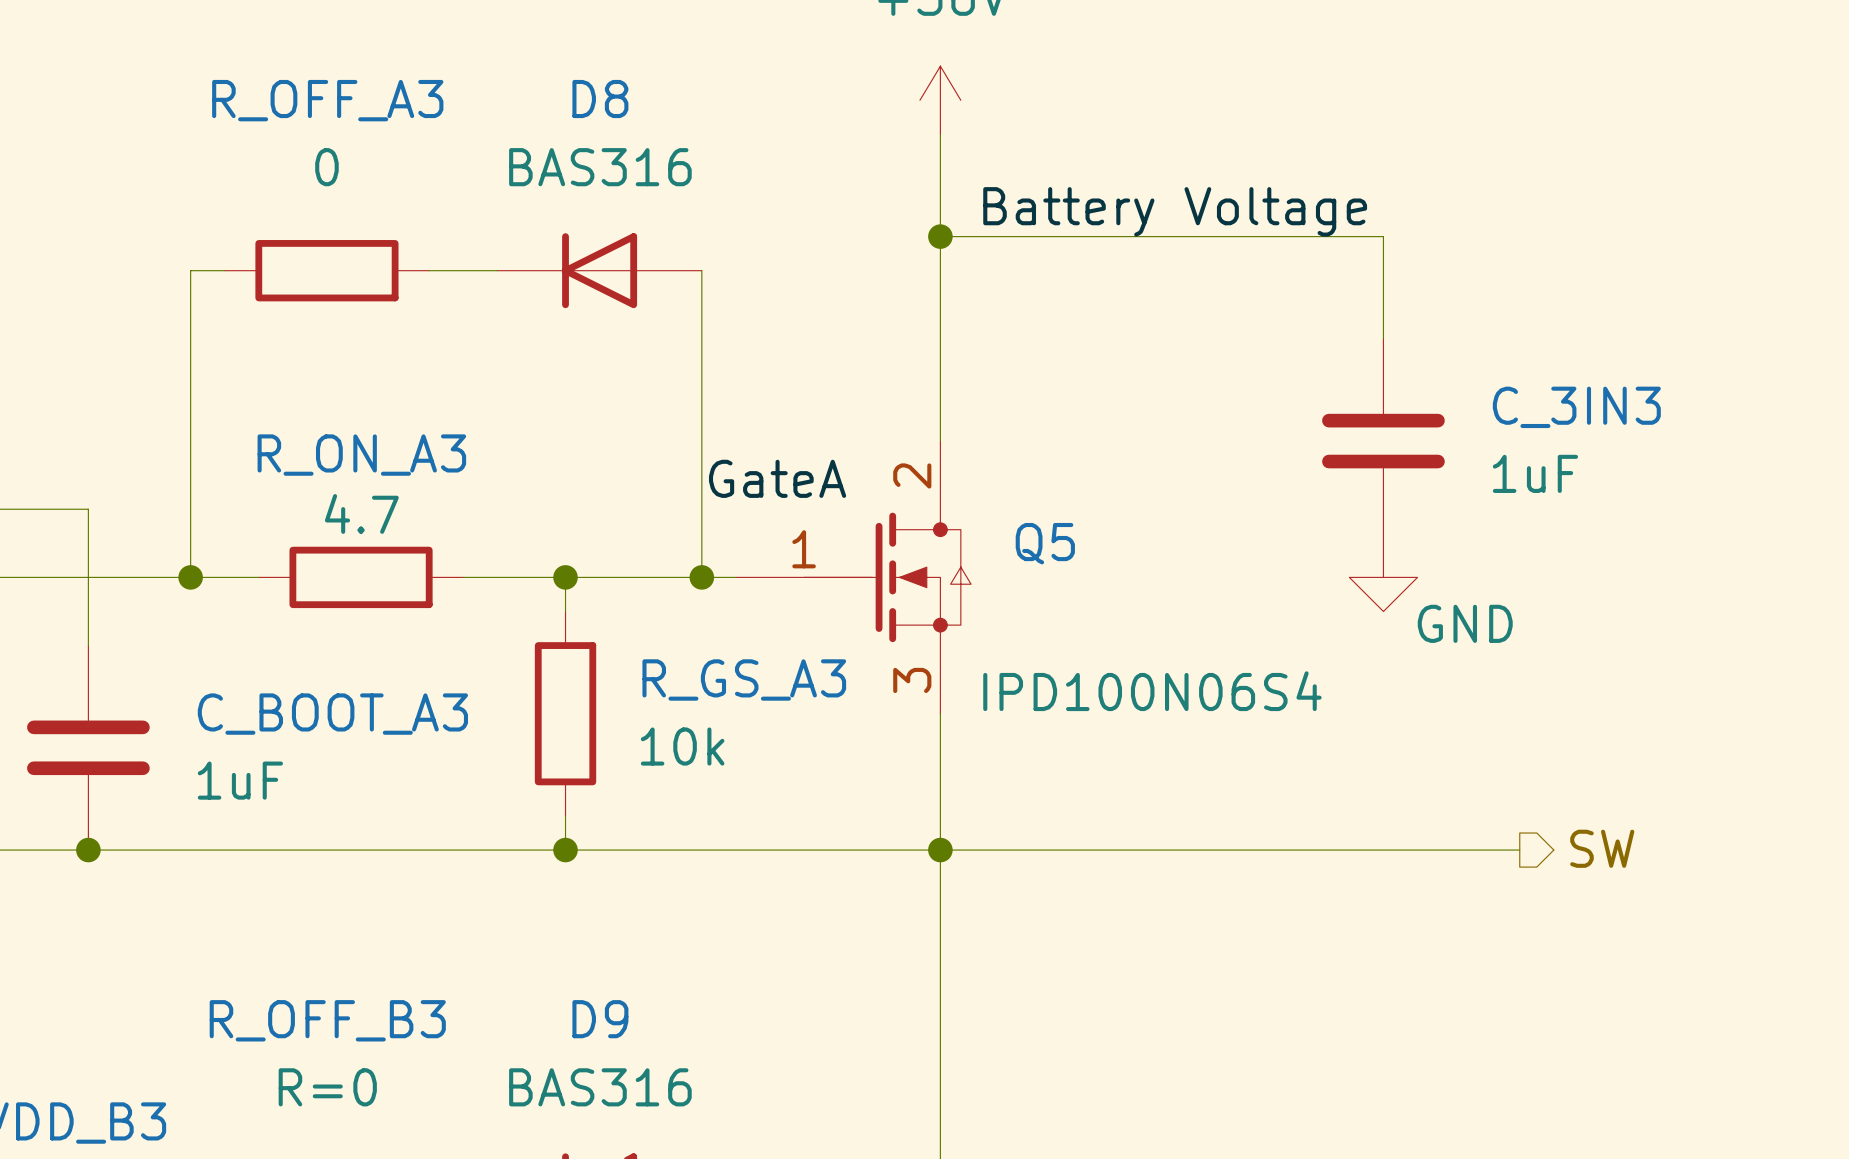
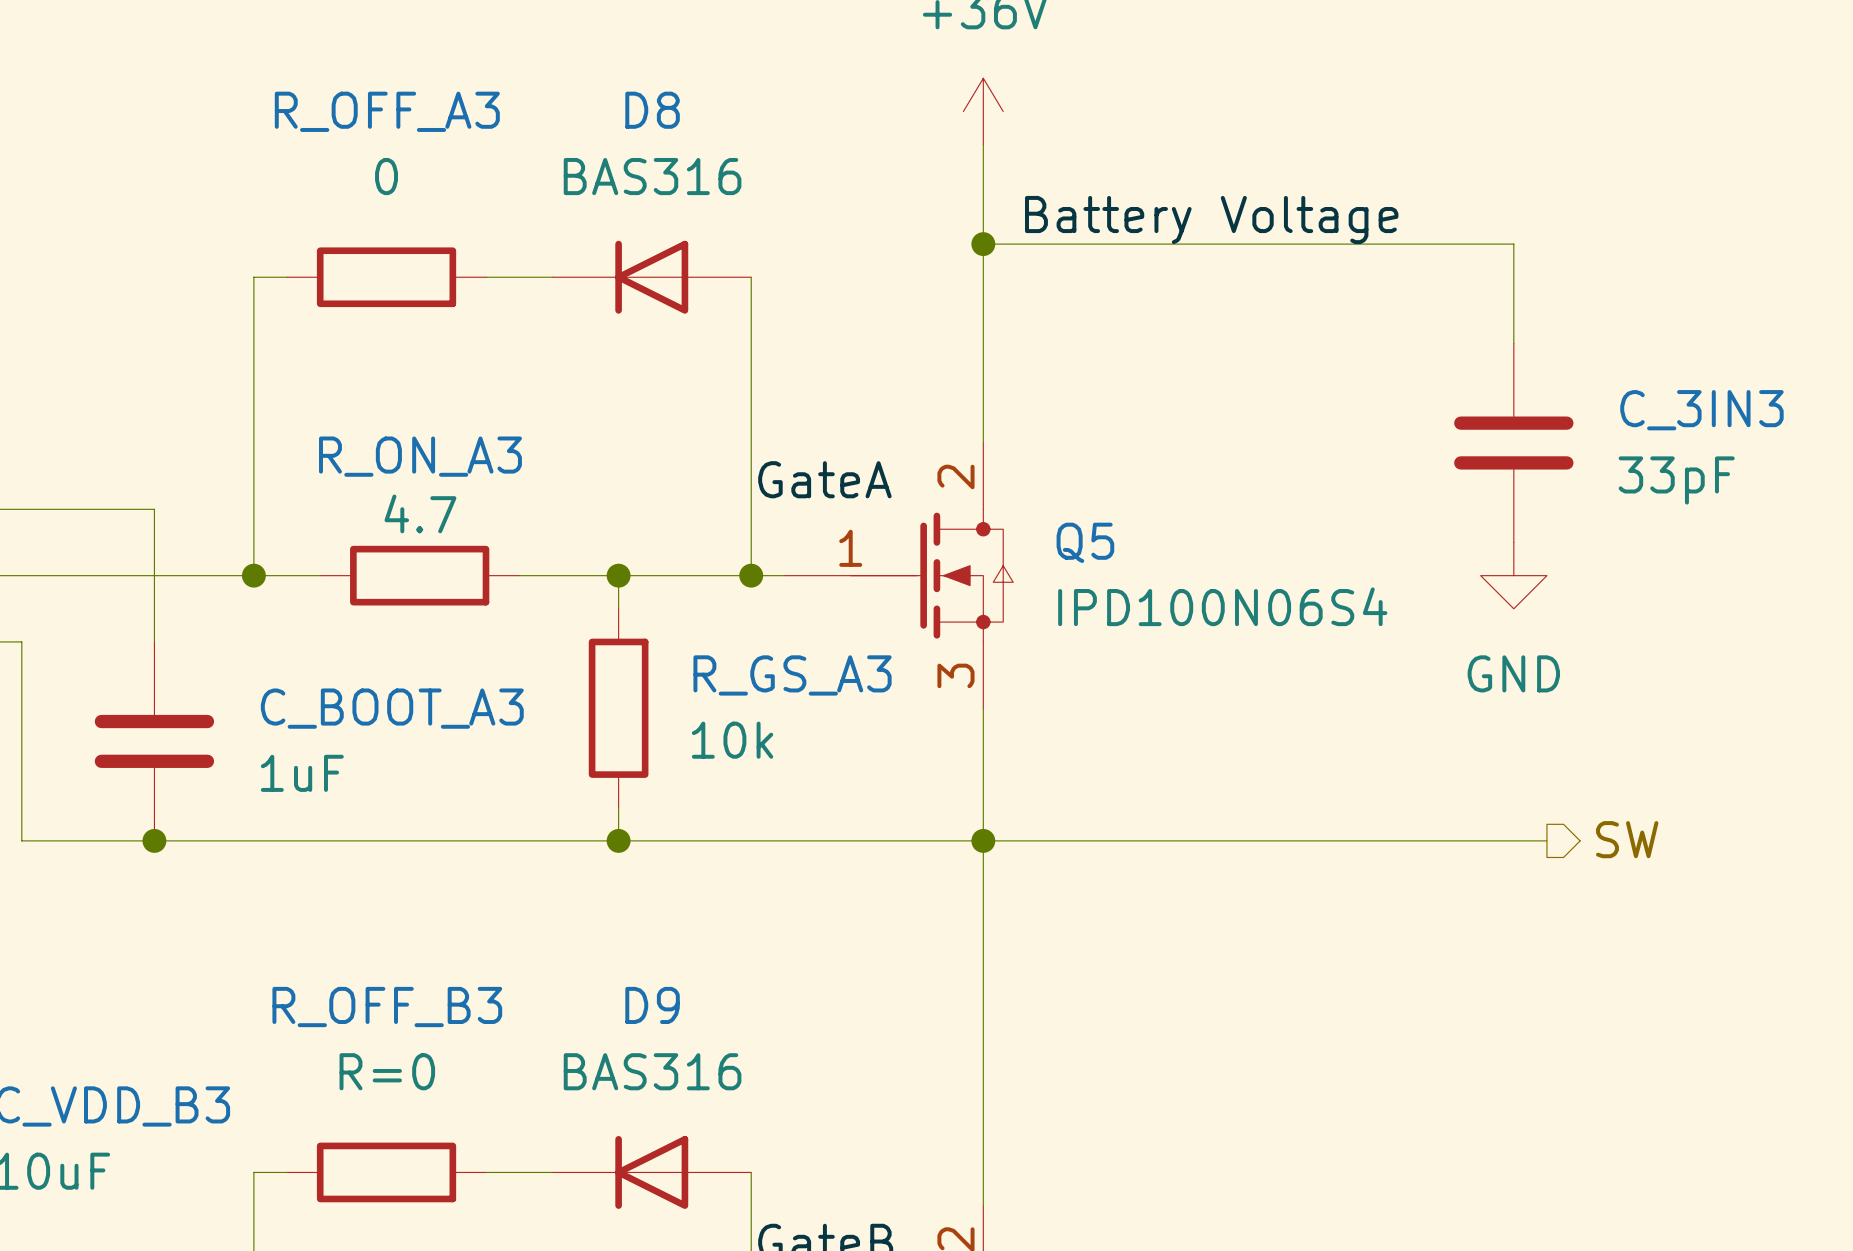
wire: (1383, 236) (1383, 338) -> (1414, 244) (1513, 244) (1513, 343)
C_3IN3 position: (1383, 441) -> (1513, 443)
C_3IN3 value: 1uF (1535, 473) -> 33pF (1676, 480)
power symbol position: GND (1383, 577) -> GND (1513, 575)
power symbol text position: GND (1465, 623) -> GND (1513, 673)
Q5 value position: IPD100N06S4 (1152, 691) -> IPD100N06S4 (1222, 606)

